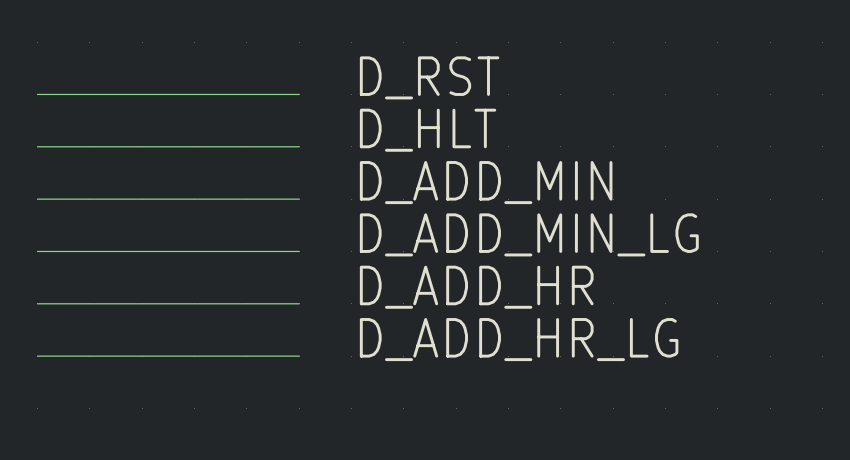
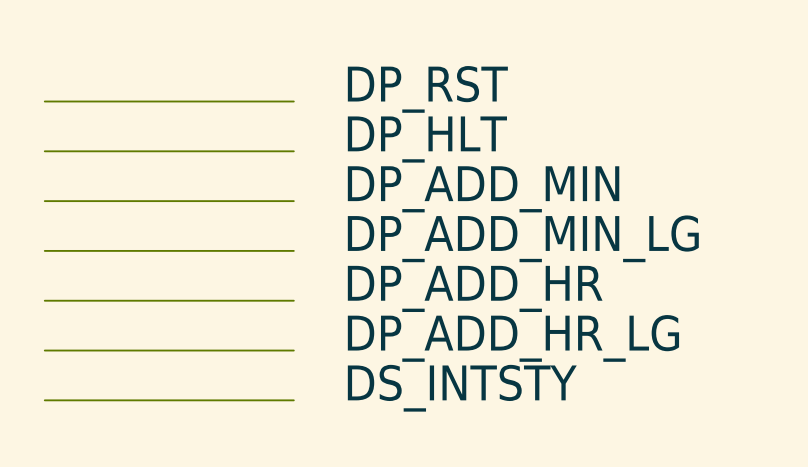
label: D_RST (429, 77) -> DP_RST (427, 89)
label: D_HLT (428, 130) -> DP_HLT (427, 139)
label: D_ADD_MIN (486, 182) -> DP_ADD_MIN (483, 189)
label: D_ADD_MIN_LG (529, 234) -> DP_ADD_MIN_LG (523, 238)
label: D_ADD_HR (476, 287) -> DP_ADD_HR (475, 288)
label: D_ADD_HR_LG (519, 339) -> DP_ADD_HR_LG (513, 338)
label: none -> DS_INTSTY (462, 388)
wire: none -> (44, 400) (293, 400)

